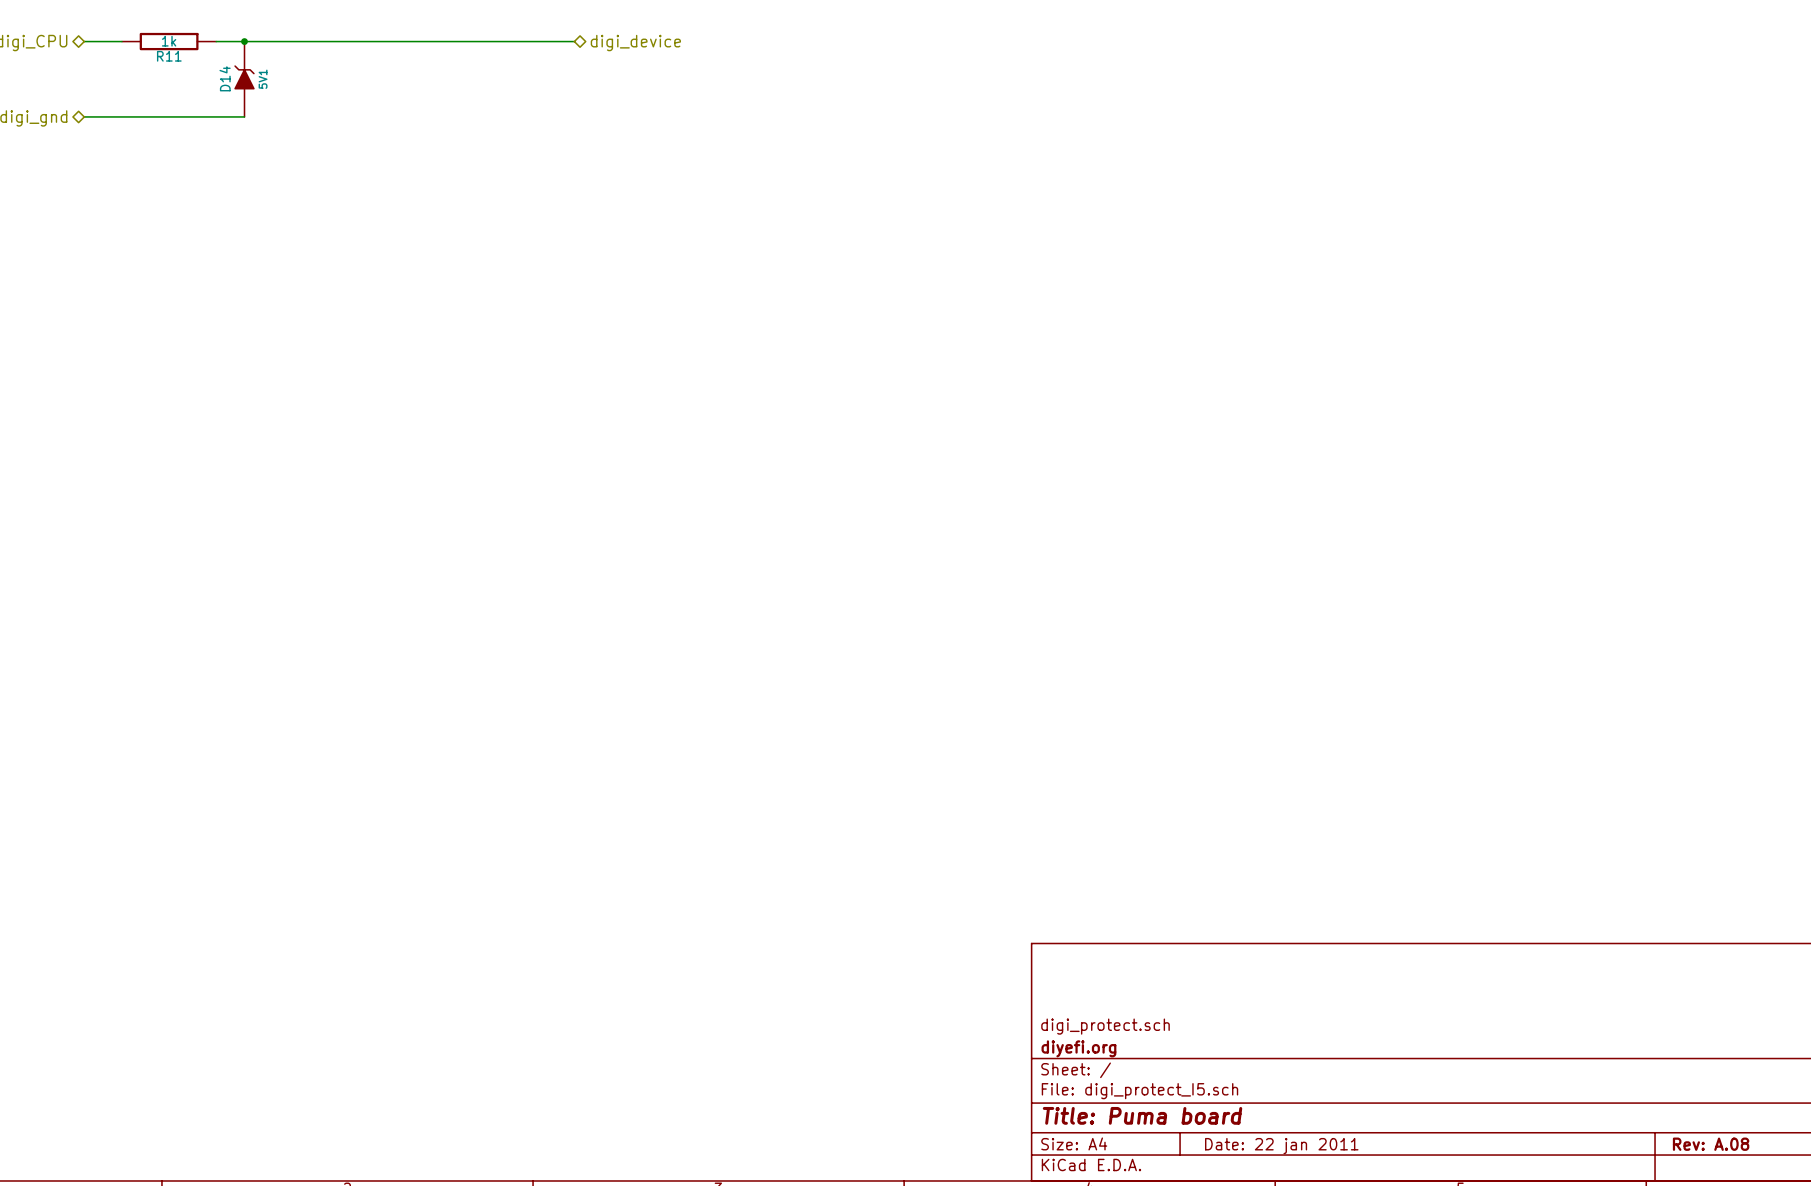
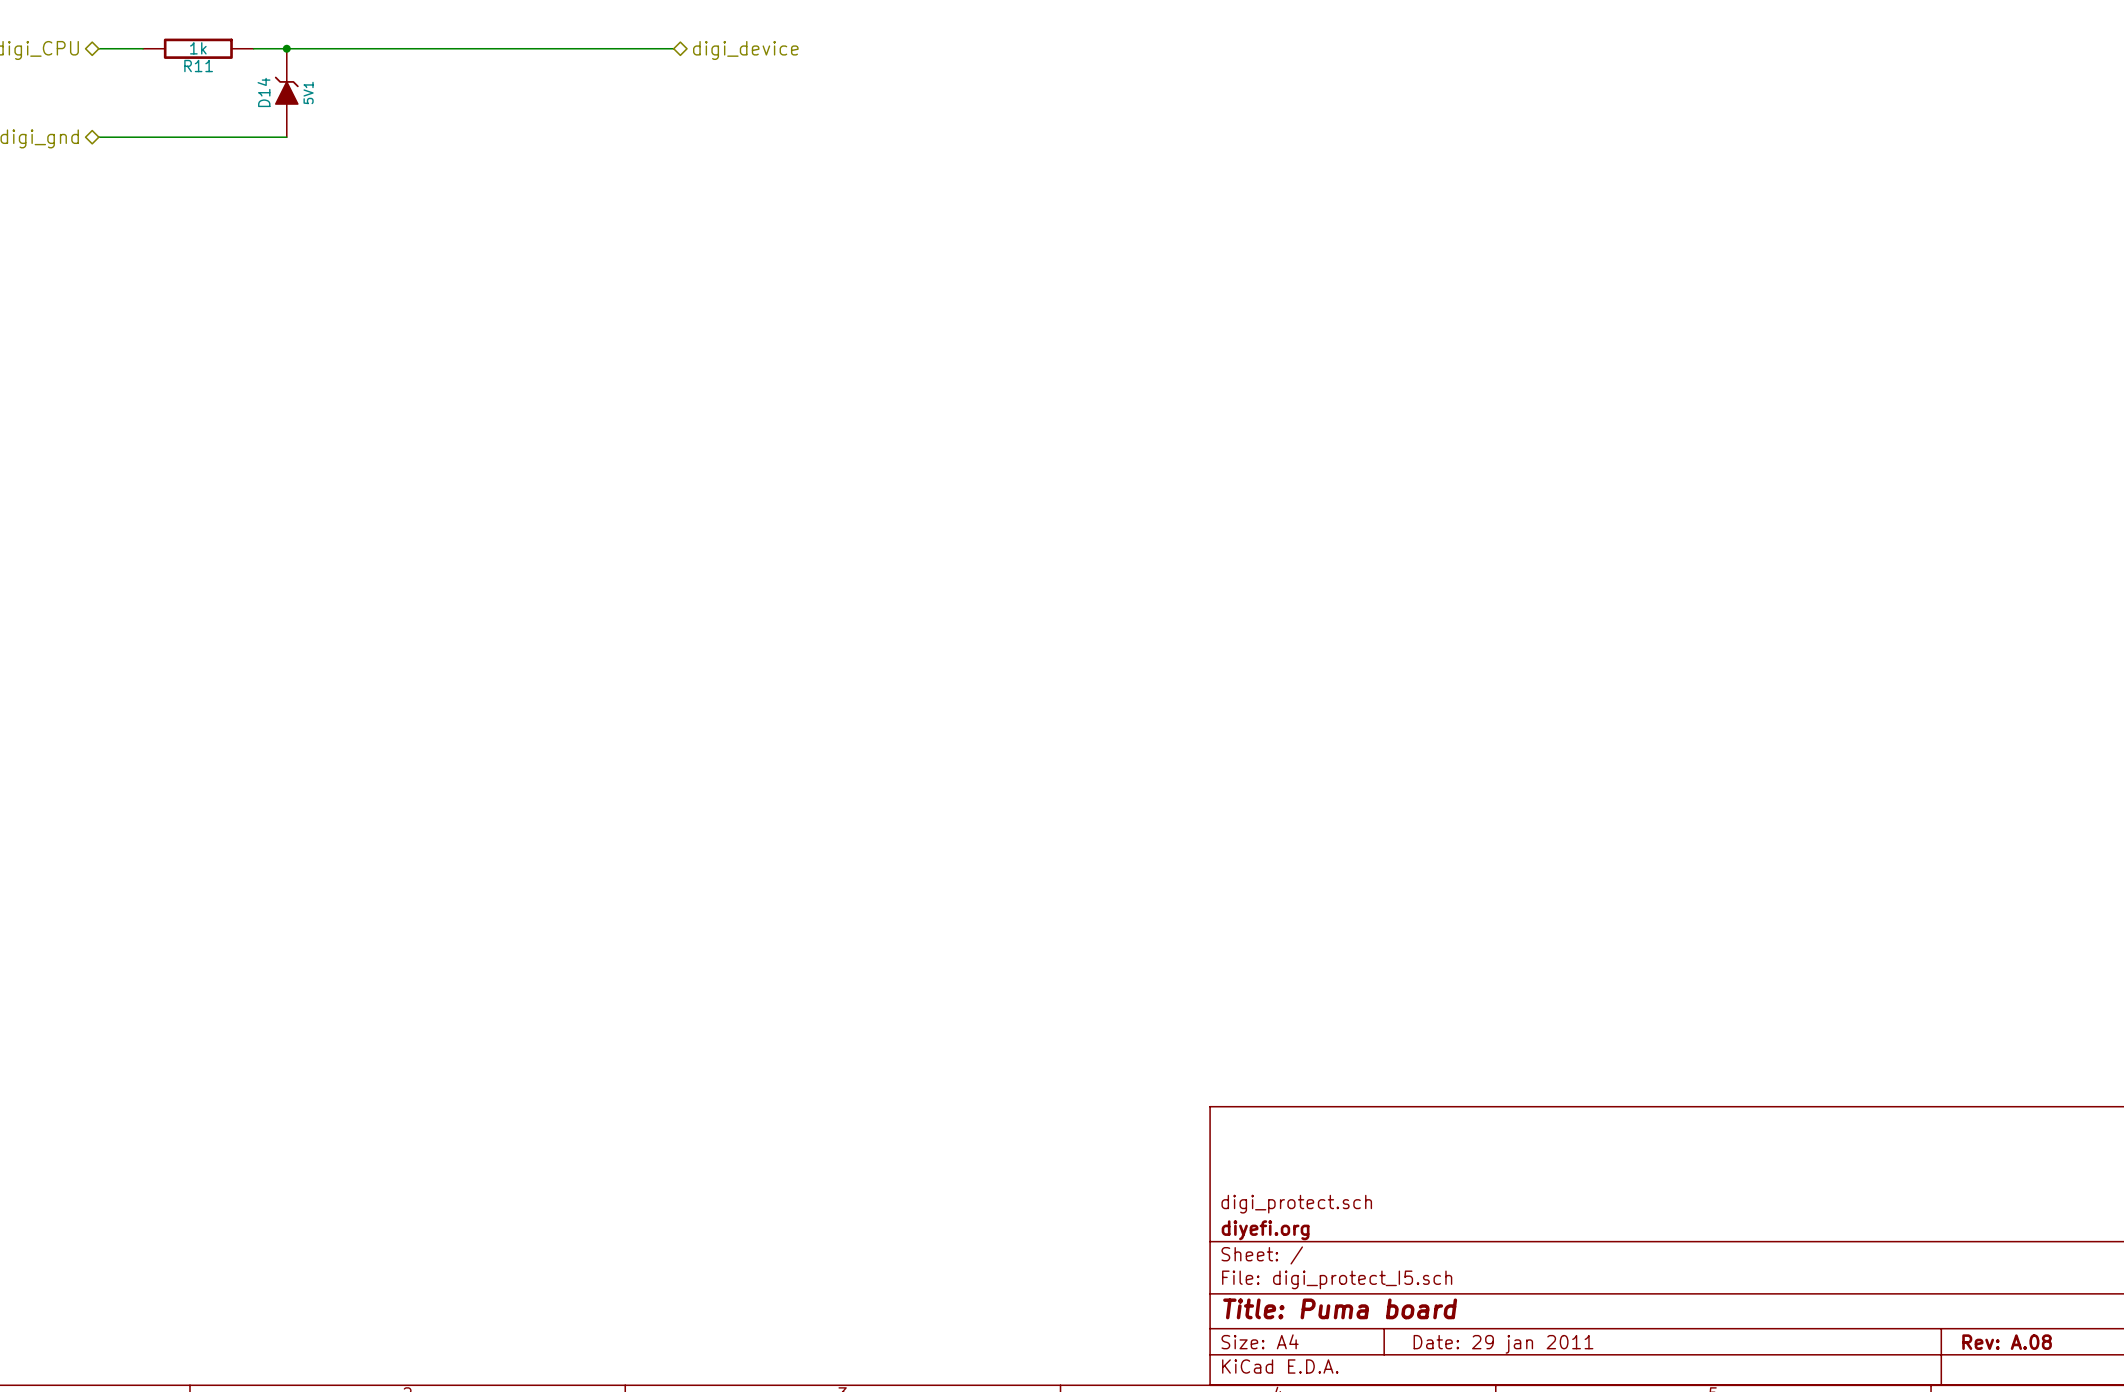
title block: Date: 22 jan 2011 (1281, 1146) -> Date: 29 jan 2011 (1503, 1344)

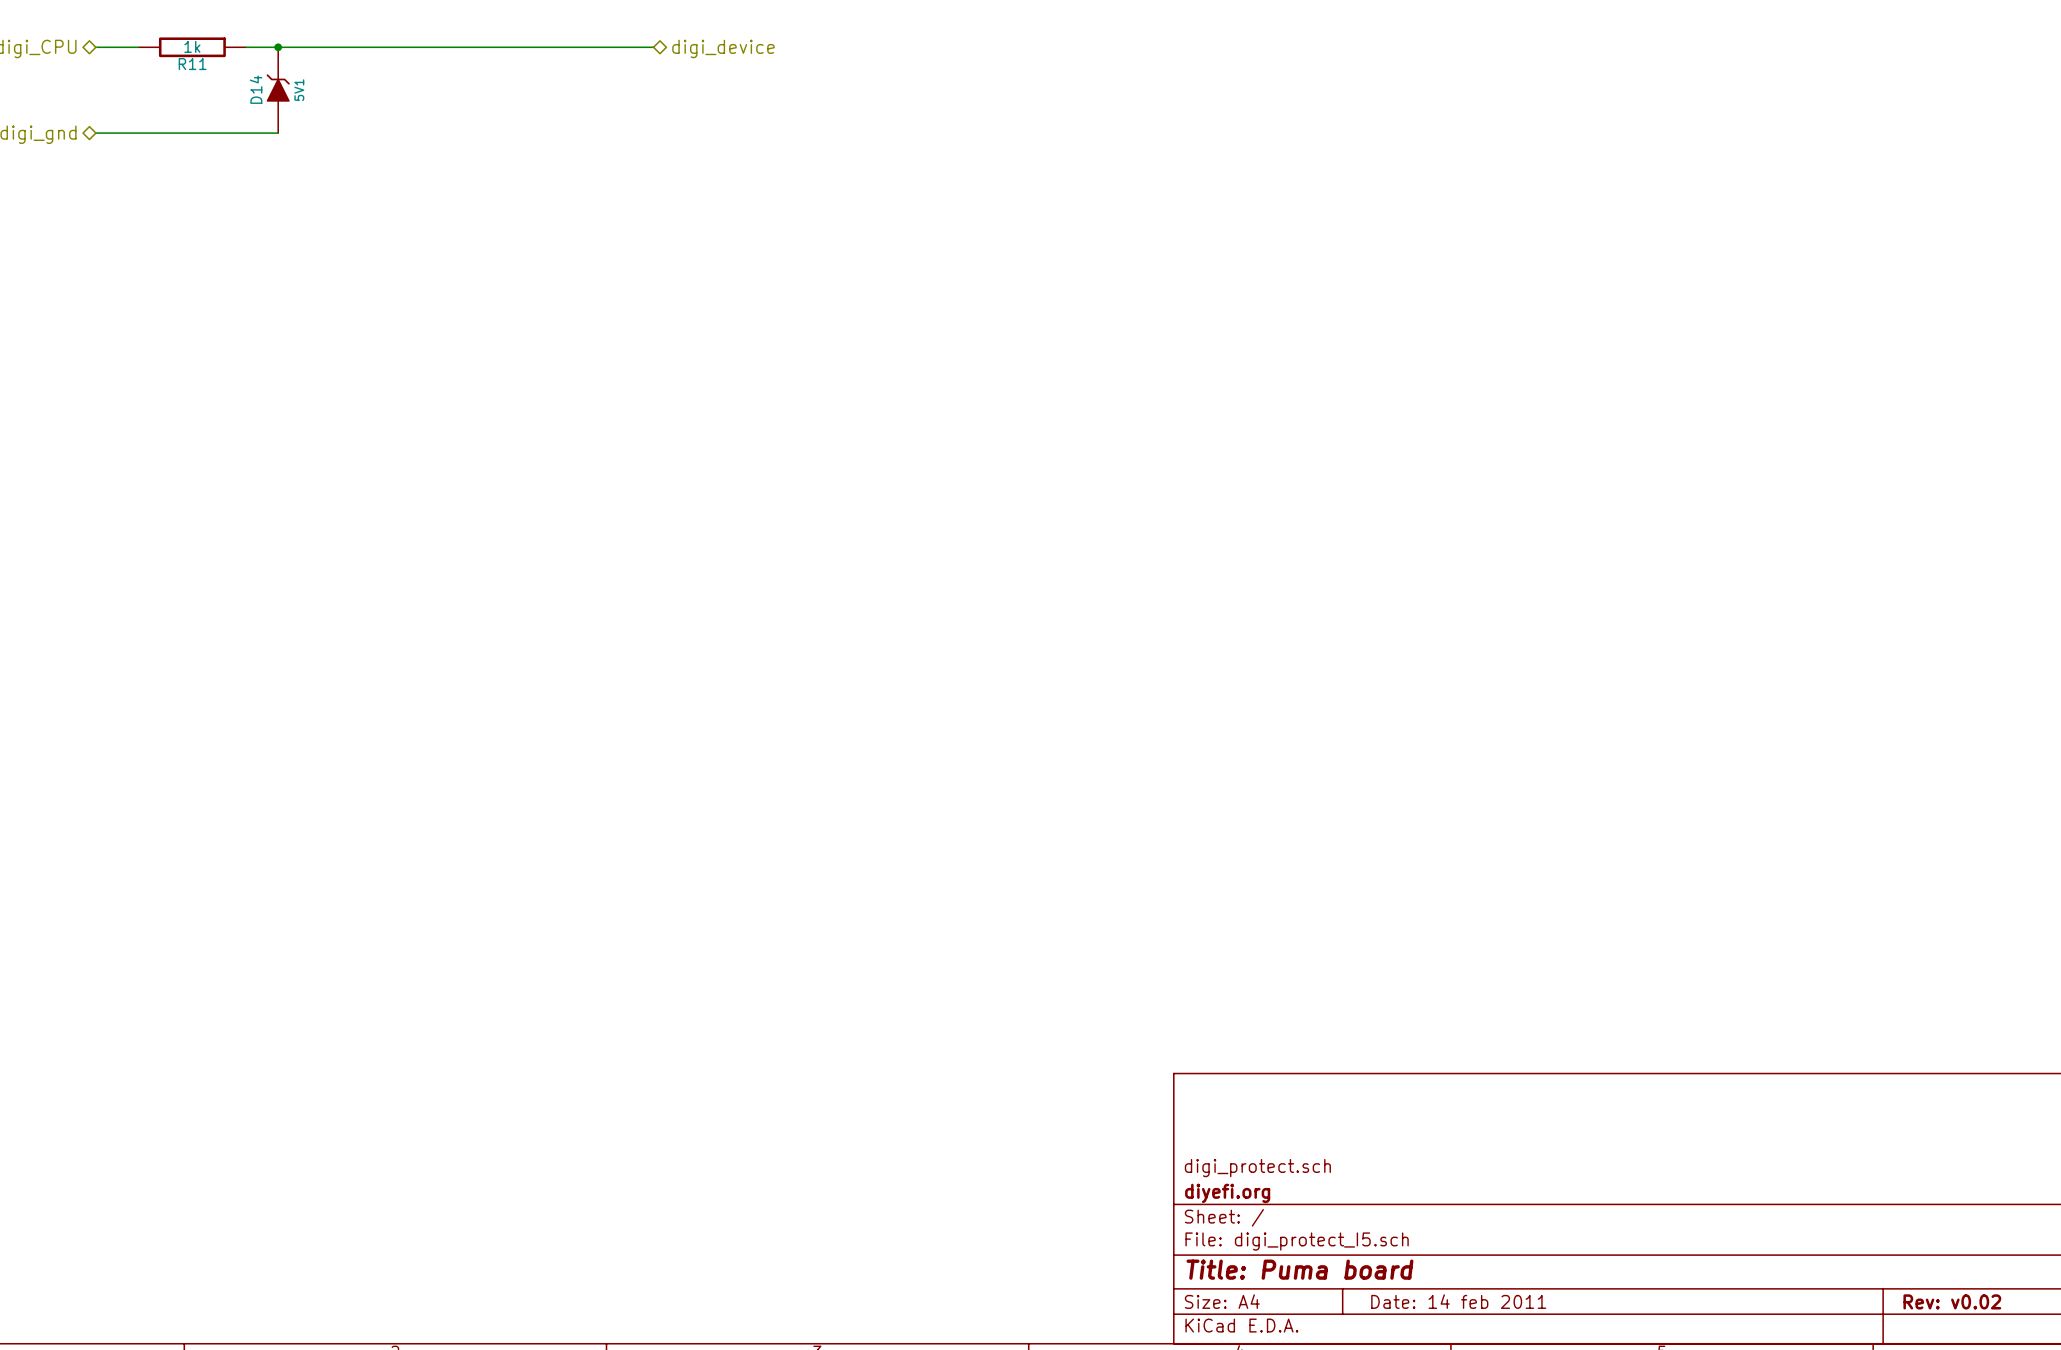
title block: Rev: A.08 (2007, 1342) -> Rev: v0.02 (1952, 1301)
title block: Date: 29 jan 2011 (1503, 1344) -> Date: 14 feb 2011 (1458, 1301)

